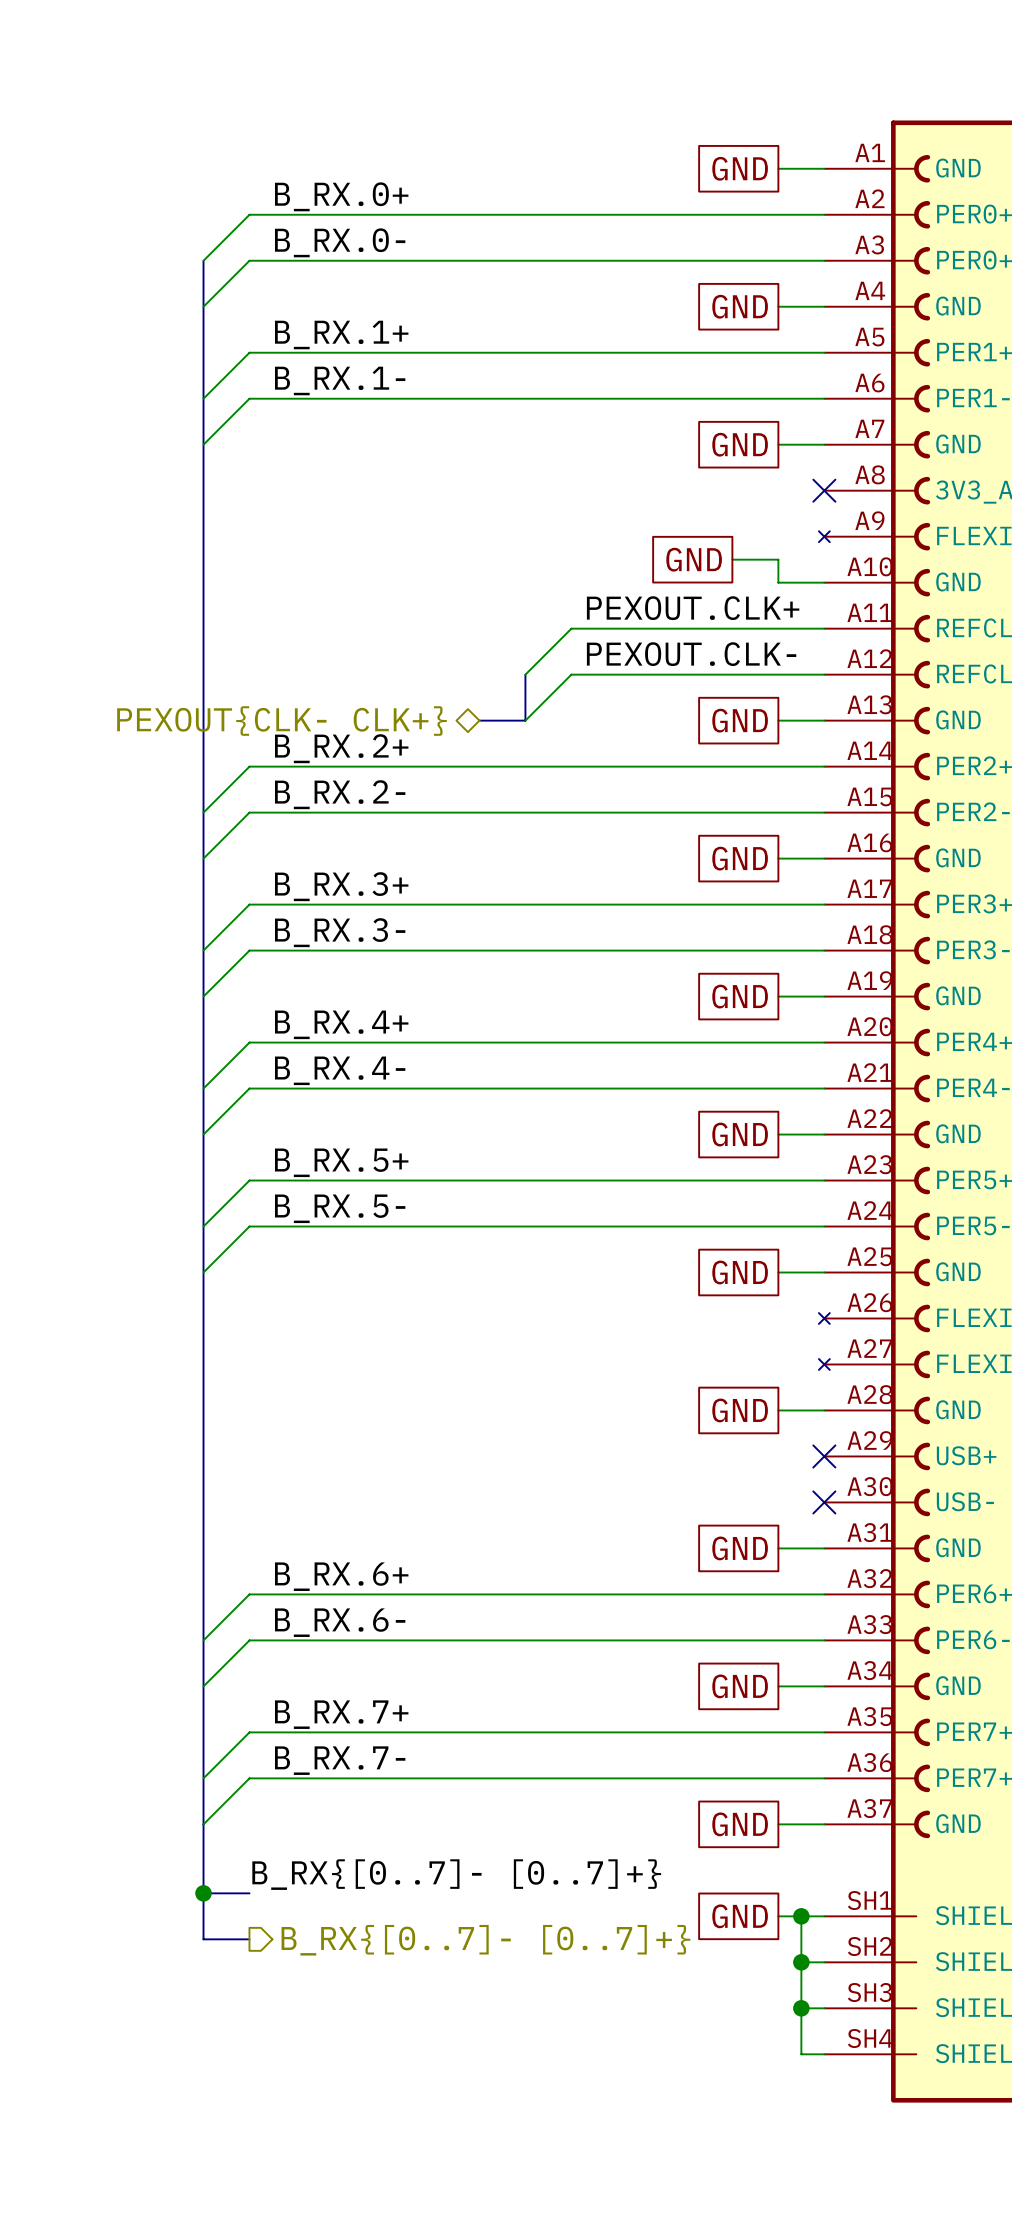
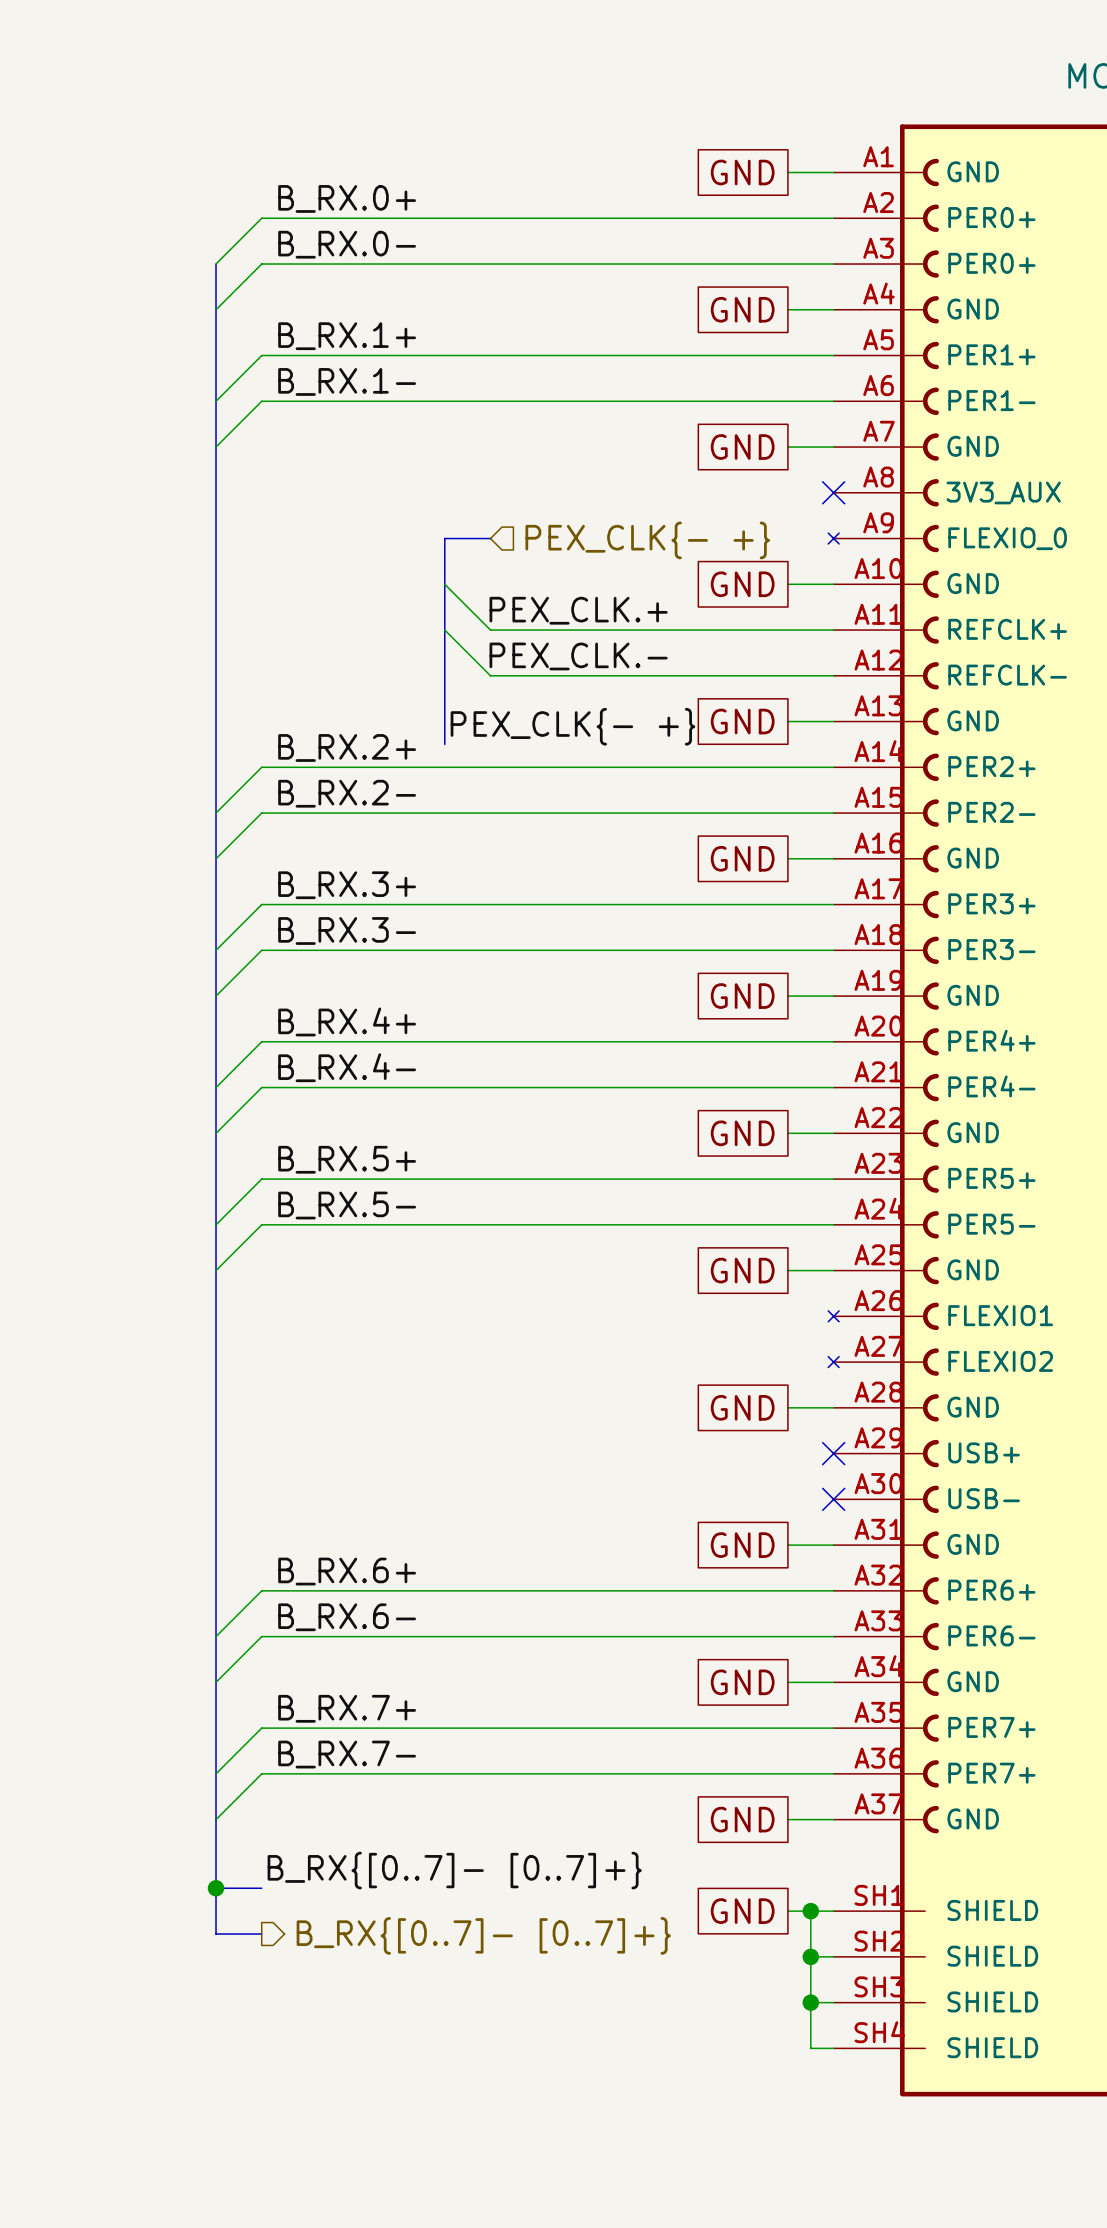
bus: none -> (490, 538) (444, 538) (444, 744)
hierarchical label: none -> PEX_CLK{- +} (647, 540)
global label position: GND (694, 559) -> GND (742, 584)
label: PEXOUT.CLK+ (693, 608) -> PEX_CLK.+ (578, 610)
wire: (571, 628) (525, 674) -> (582, 630) (490, 630) (444, 584)
label: PEXOUT.CLK- (691, 654) -> PEX_CLK.- (578, 656)
bus: (525, 674) (525, 720) (479, 720) -> none
wire: (571, 674) (525, 720) -> (582, 675) (490, 675) (444, 630)
hierarchical label: PEXOUT{CLK- CLK+} (281, 721) -> none
label: none -> PEX_CLK{- +} (572, 726)

